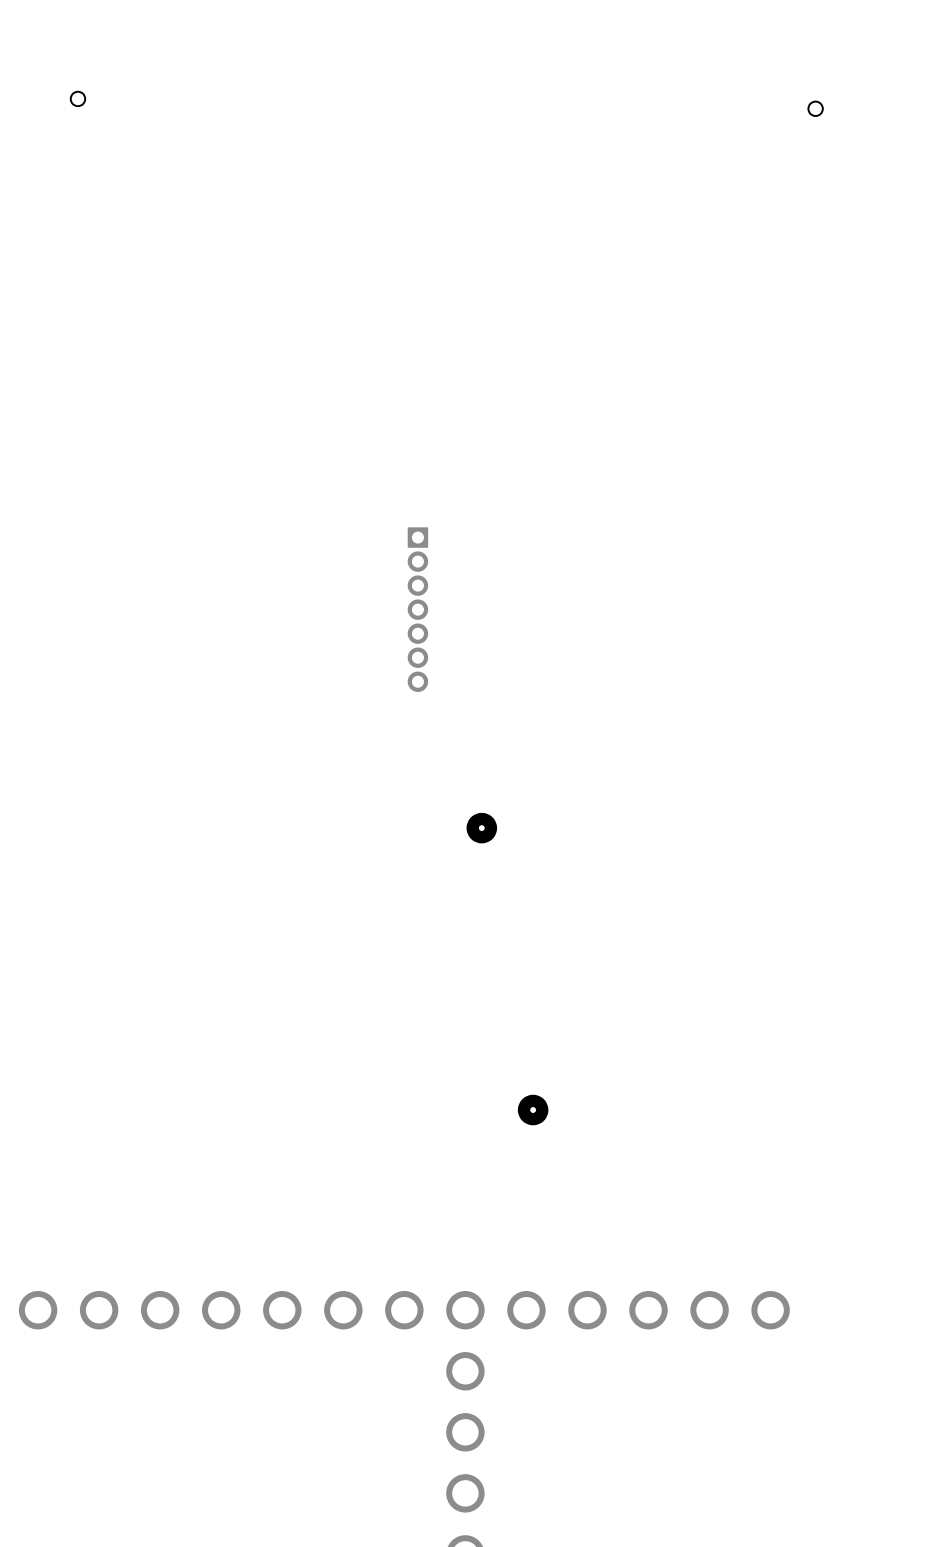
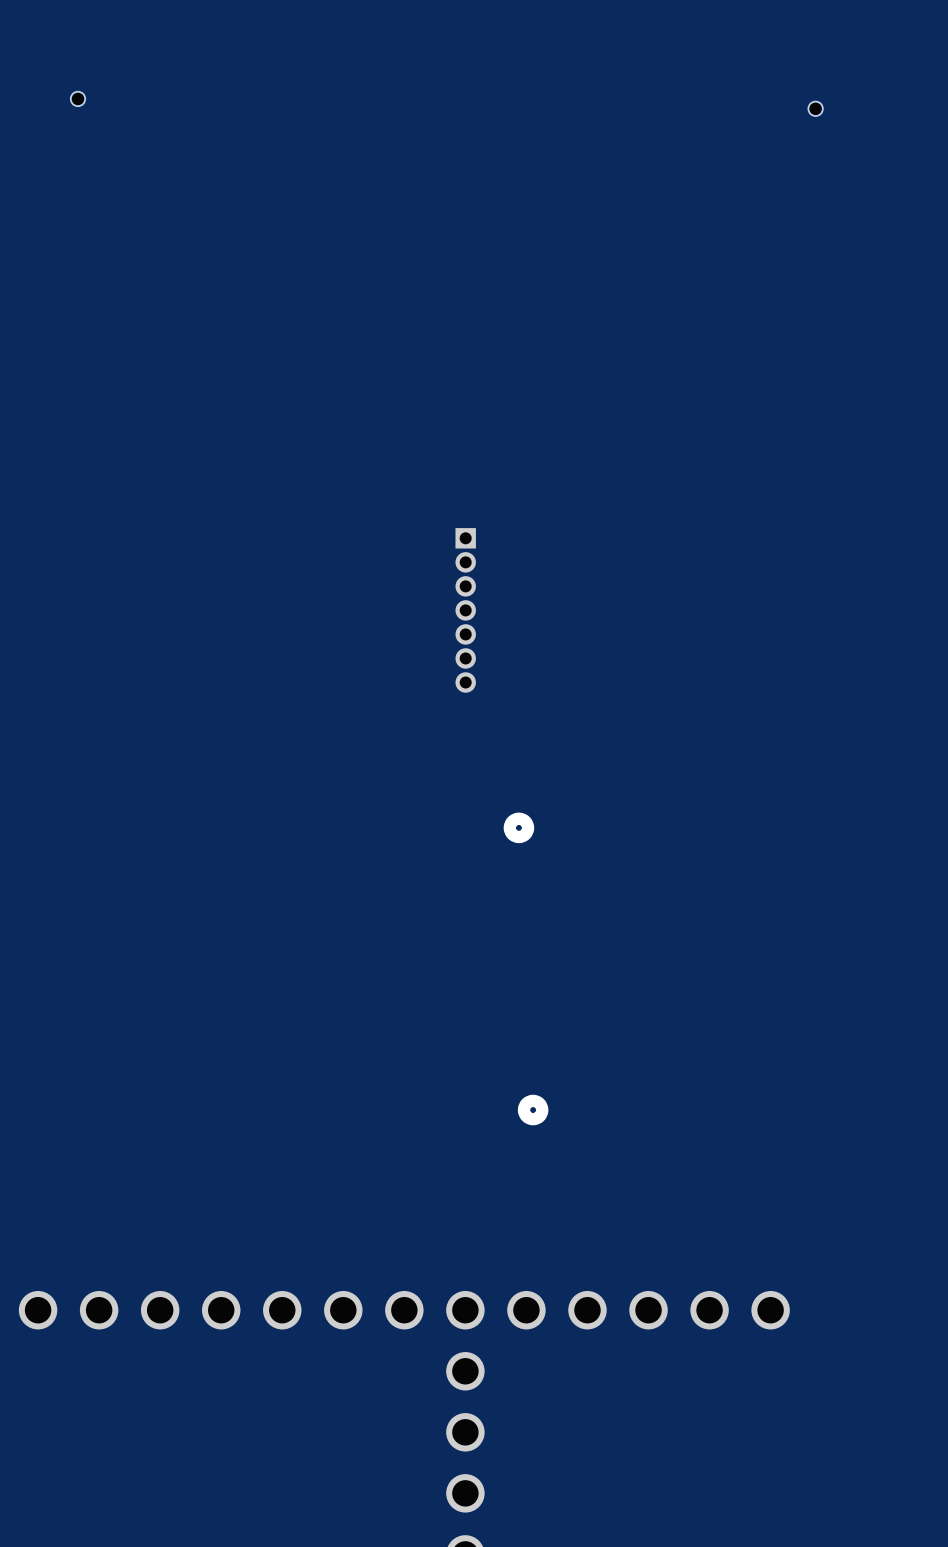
part position: (417, 609) -> (465, 610)
part position: (481, 828) -> (518, 827)

